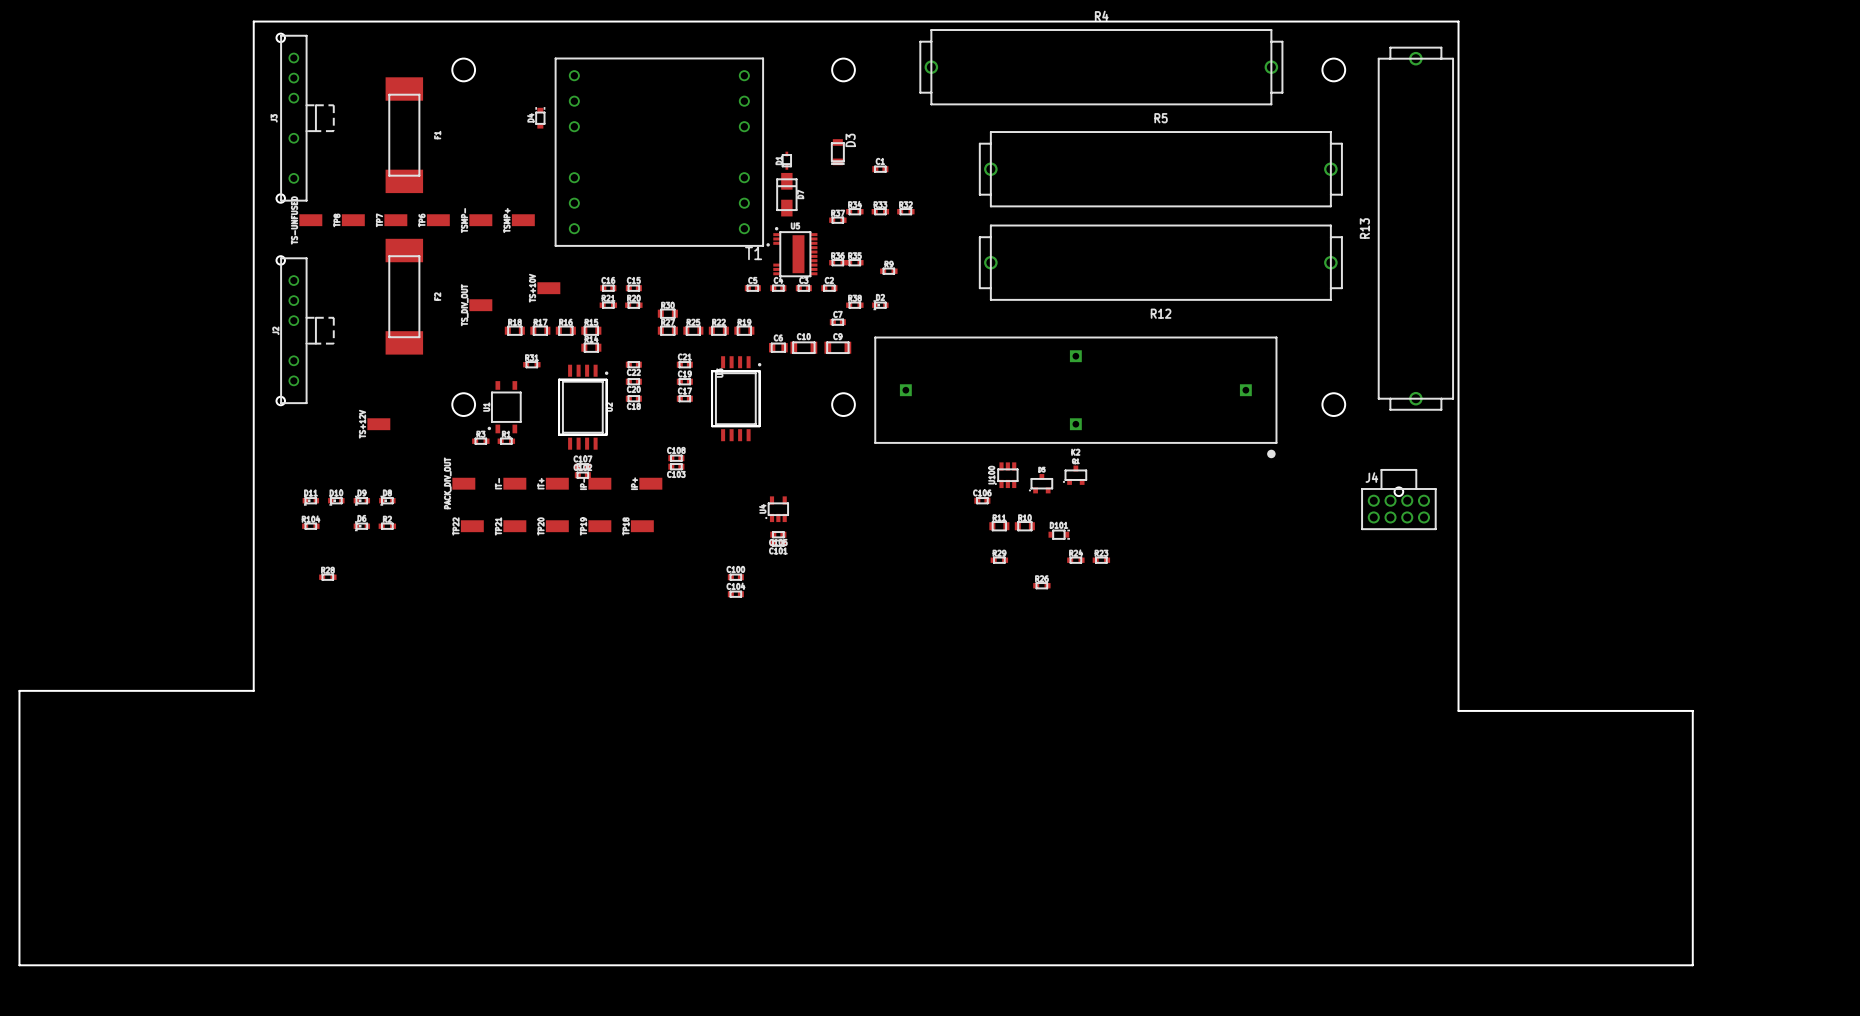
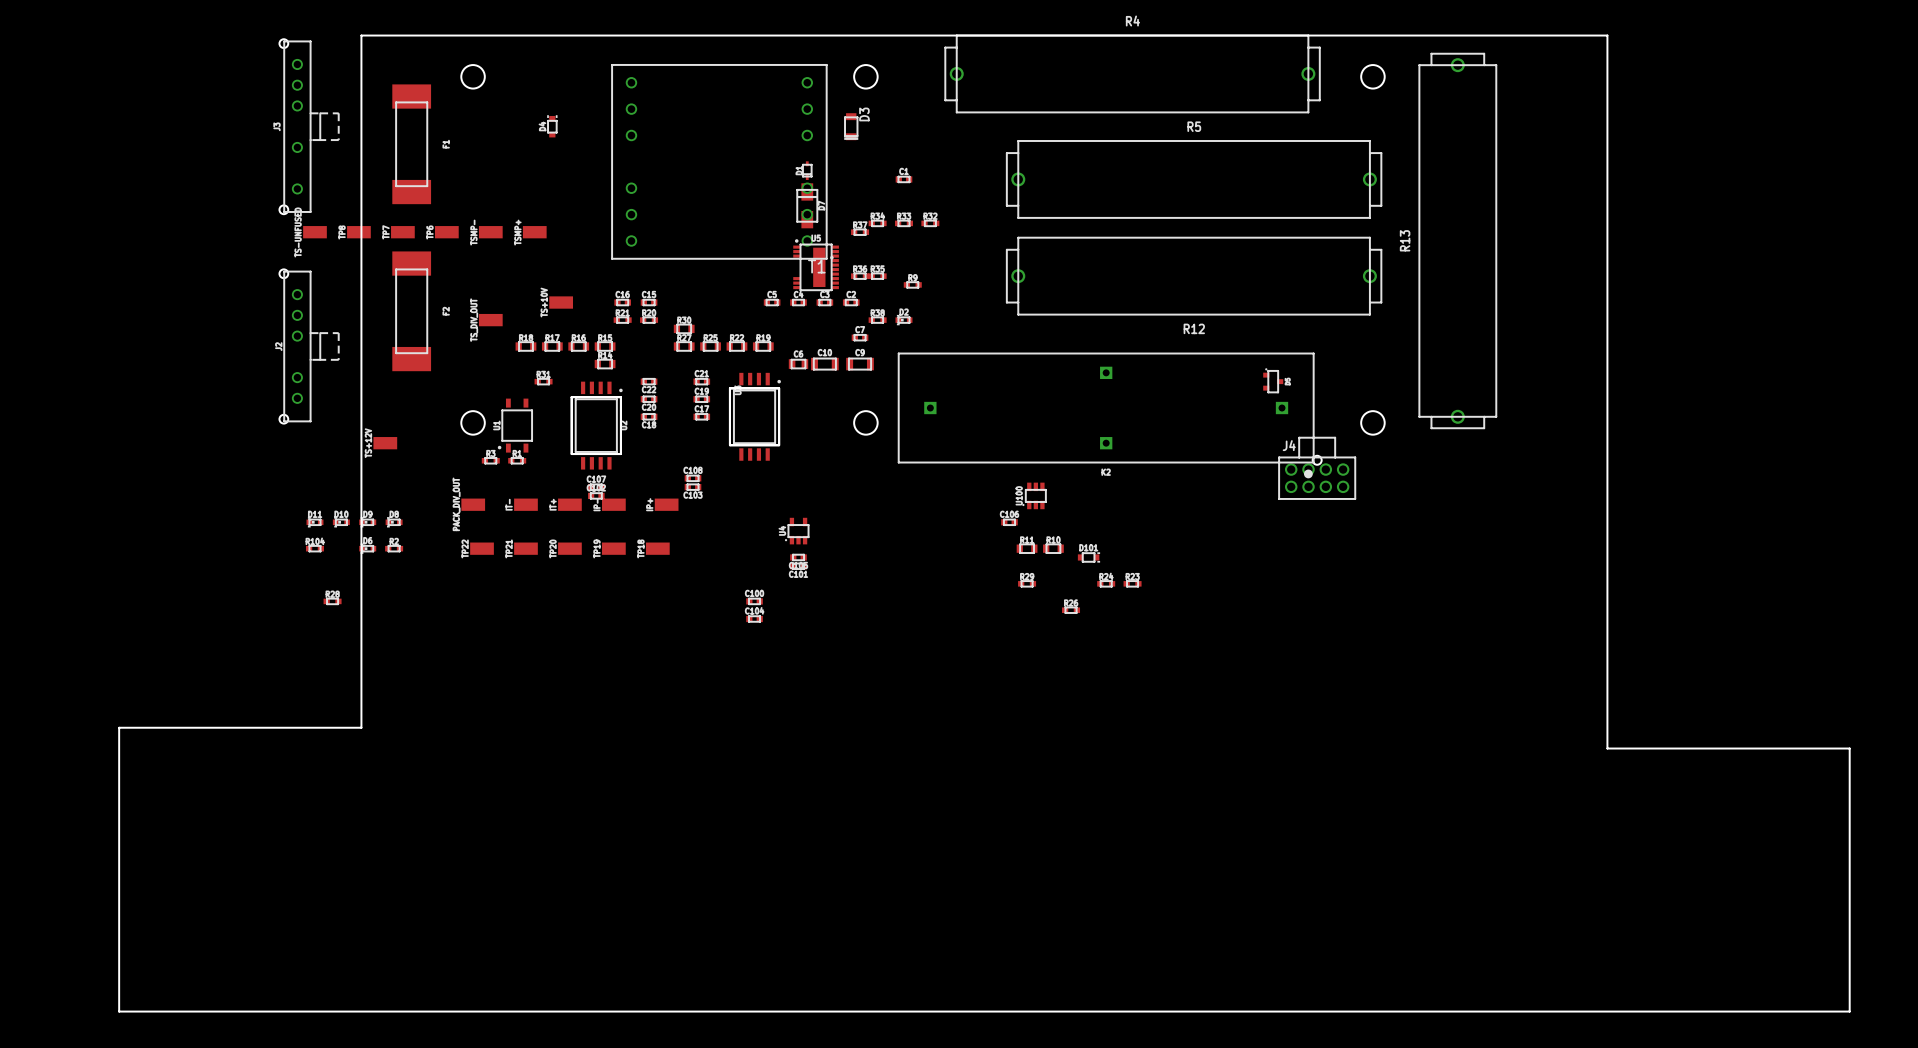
board edge: (253, 21) (1458, 21) (1458, 710) (1692, 710) (1692, 965) (19, 965) (19, 690) (253, 690) (253, 21) -> (361, 35) (1607, 35) (1607, 748) (1849, 748) (1849, 1011) (119, 1011) (119, 727) (361, 727) (361, 35)
T1 position: (662, 152) -> (722, 161)
D3 position: (837, 152) -> (851, 126)
part: (1074, 475) -> none
part rotation: 0° (1040, 483) -> 90° clockwise (1273, 380)
part position: (1040, 483) -> (1273, 380)
J4 position: (1398, 499) -> (1317, 468)

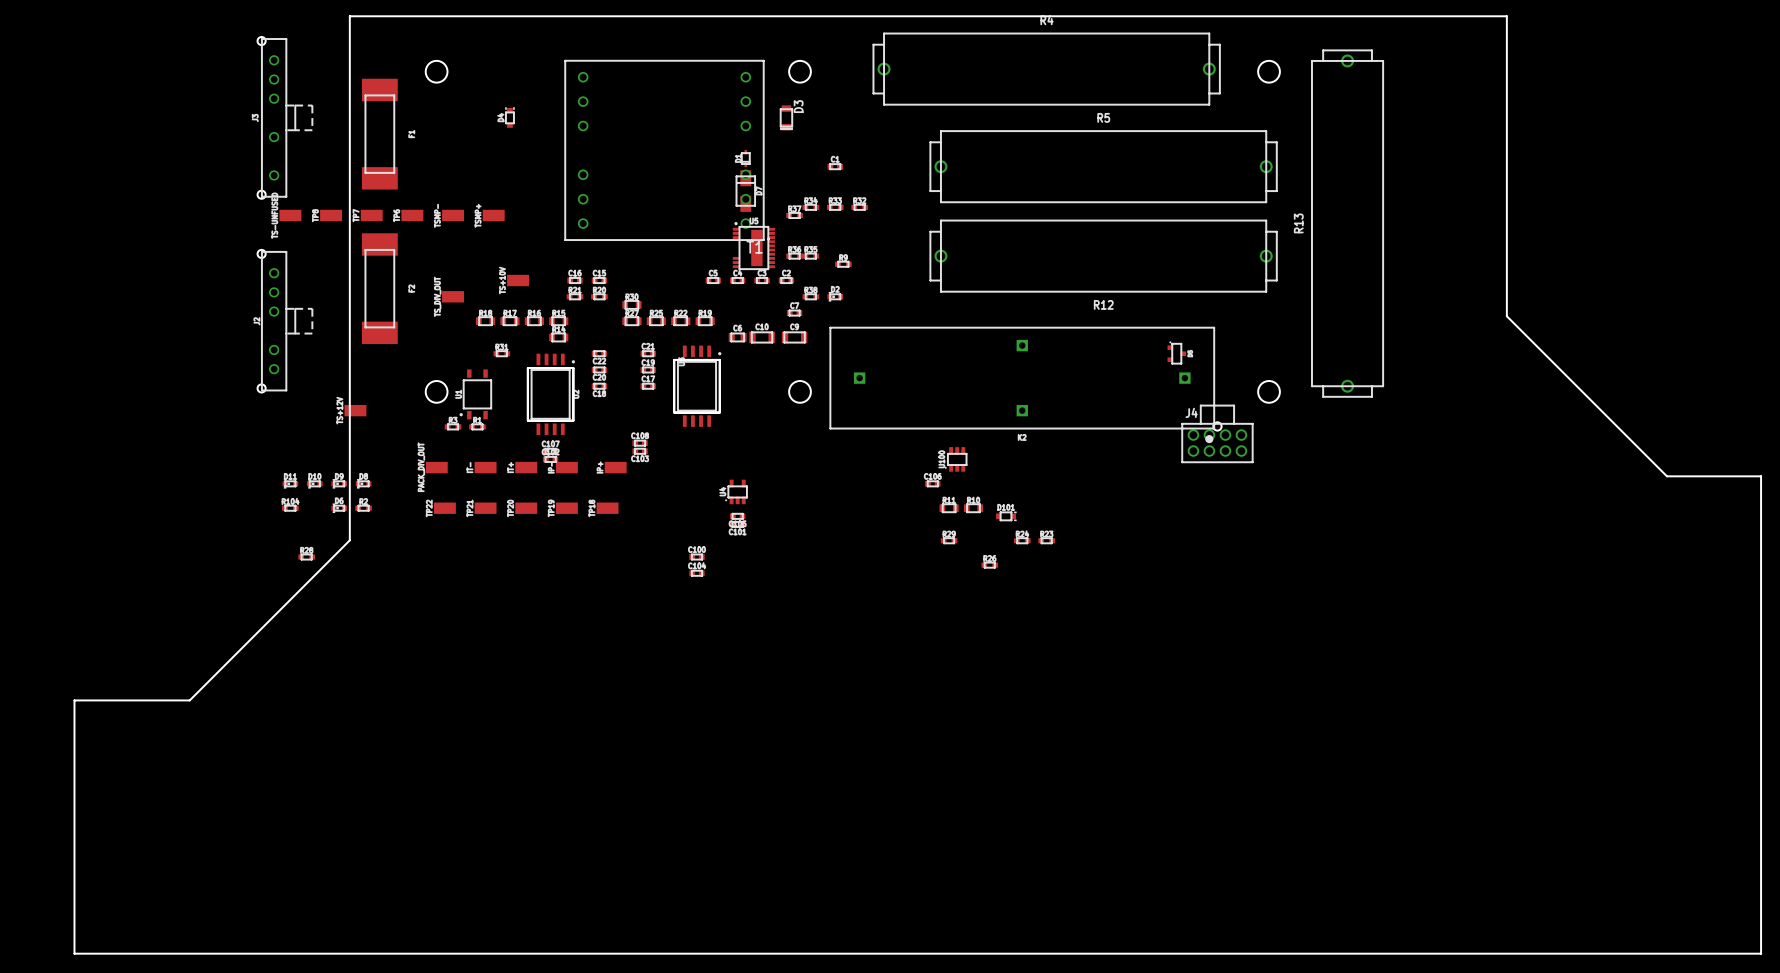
board edge: (361, 35) (1607, 35) (1607, 748) (1849, 748) (1849, 1011) (119, 1011) (119, 727) (361, 727) (361, 35) -> (349, 16) (349, 540) (189, 700) (74, 700) (74, 953) (1761, 953) (1761, 476) (1666, 476) (1506, 316) (1506, 16) (349, 16)

